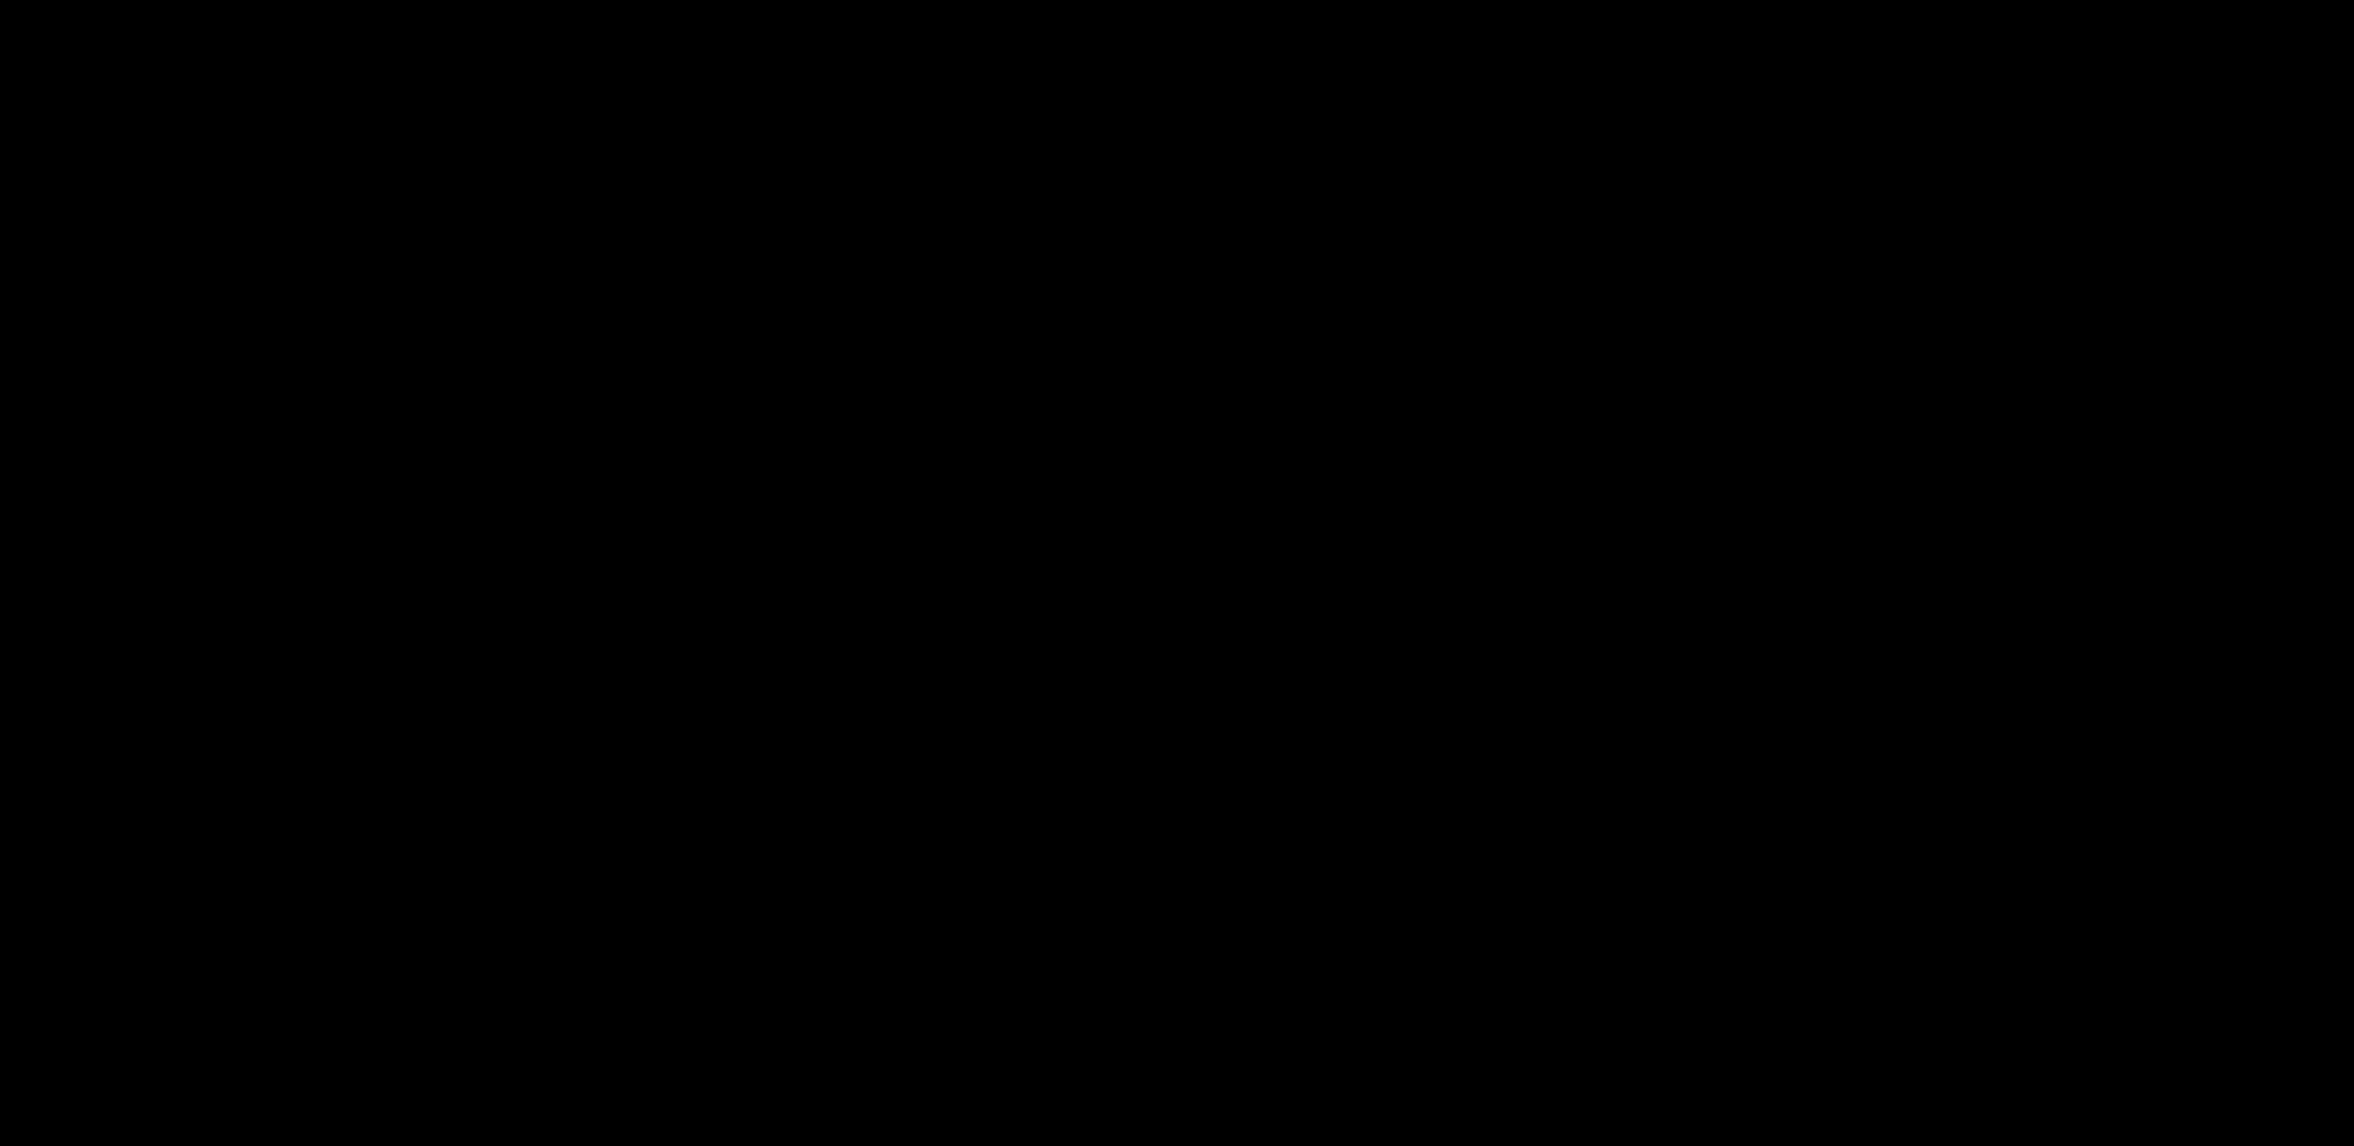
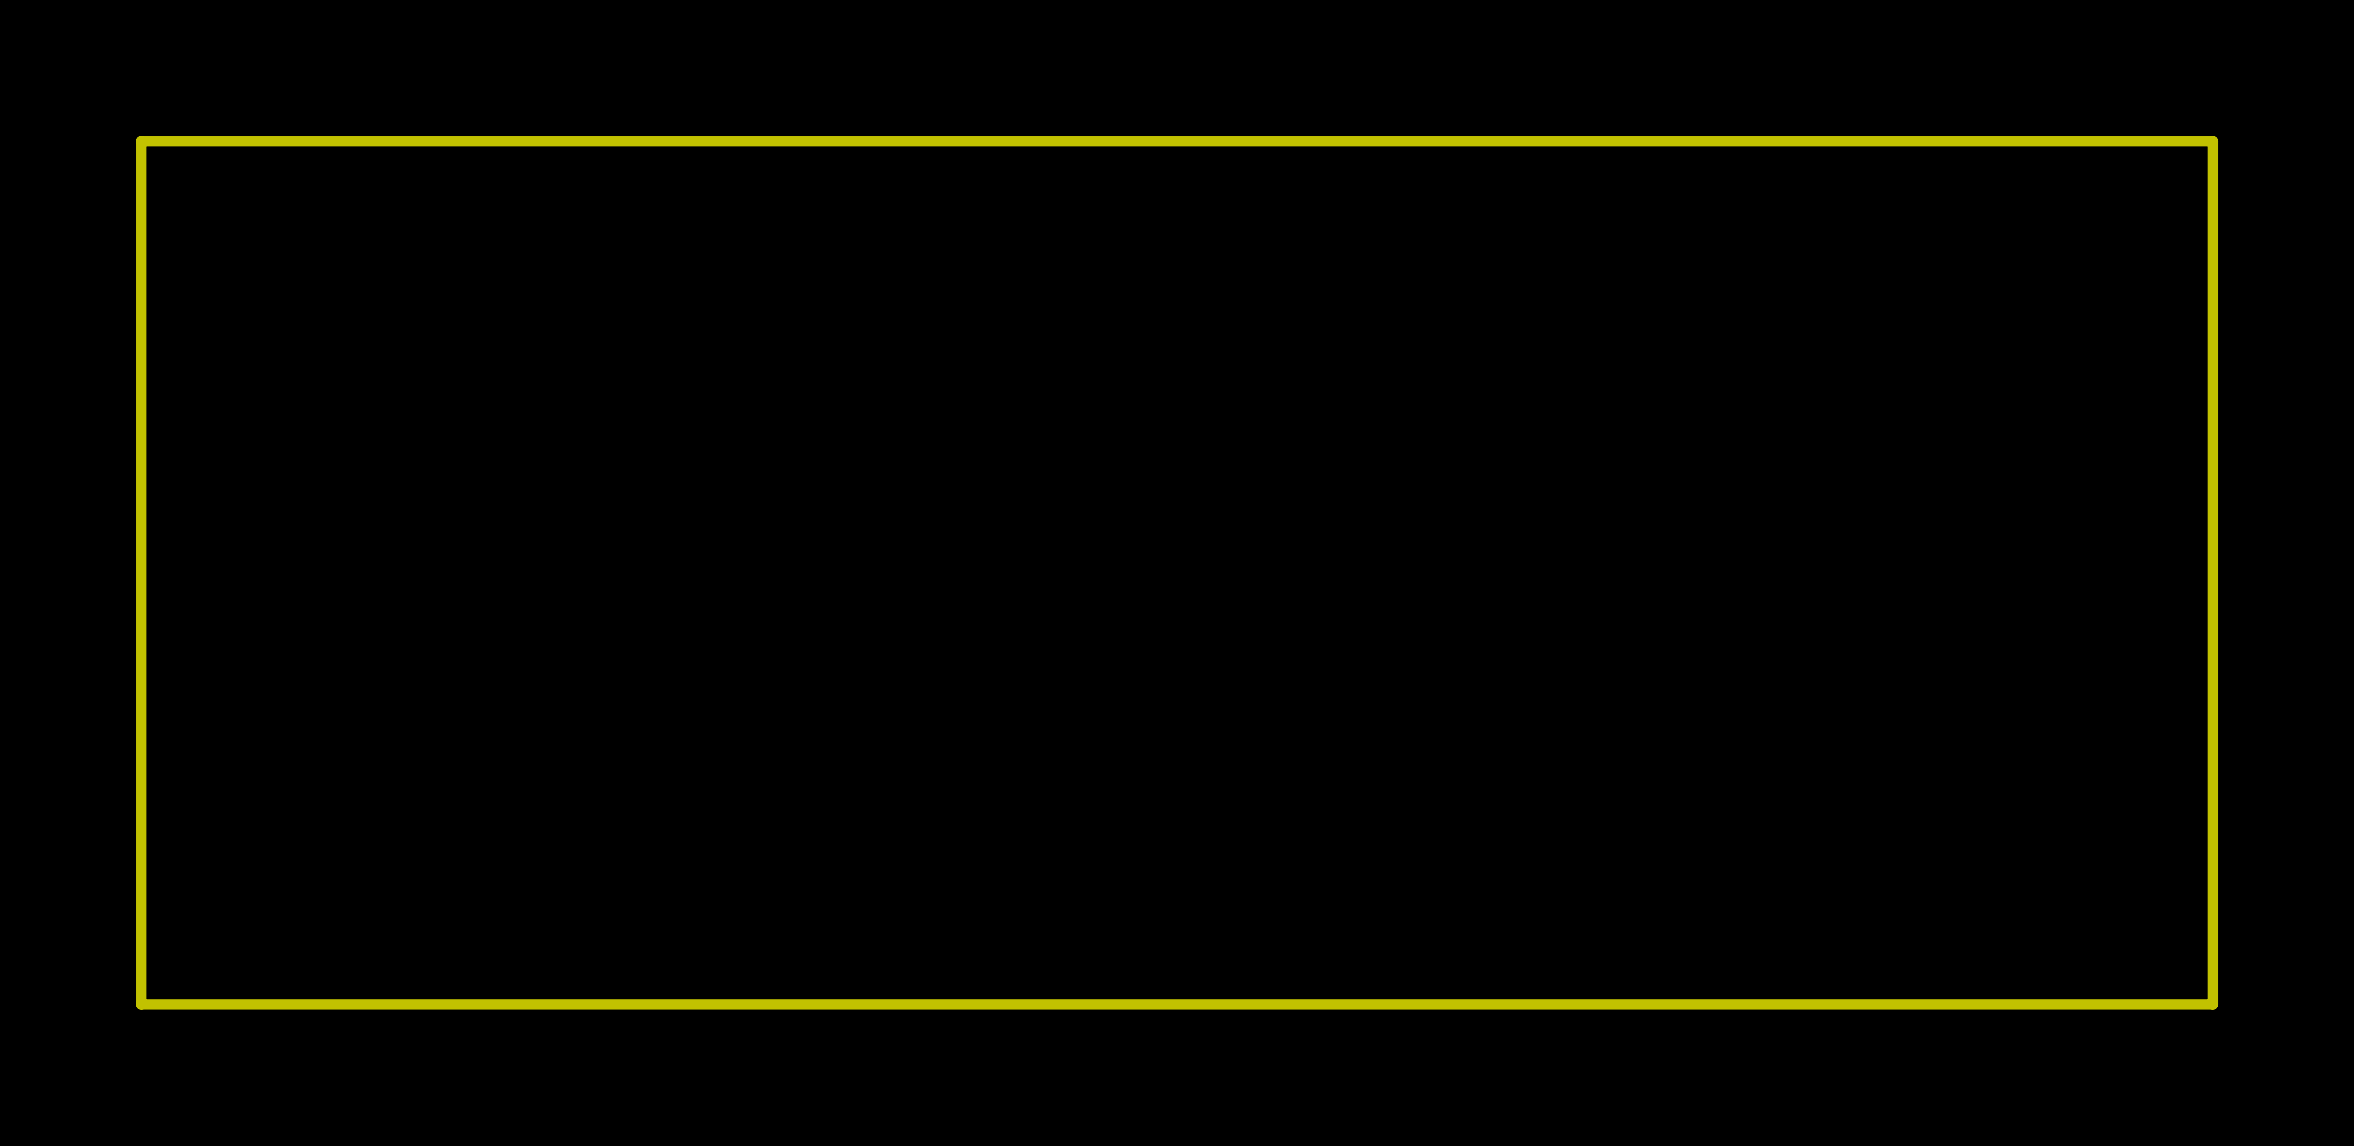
board edge: none -> (2212, 141) (141, 141) (141, 1004) (2212, 1004) (2212, 141)

